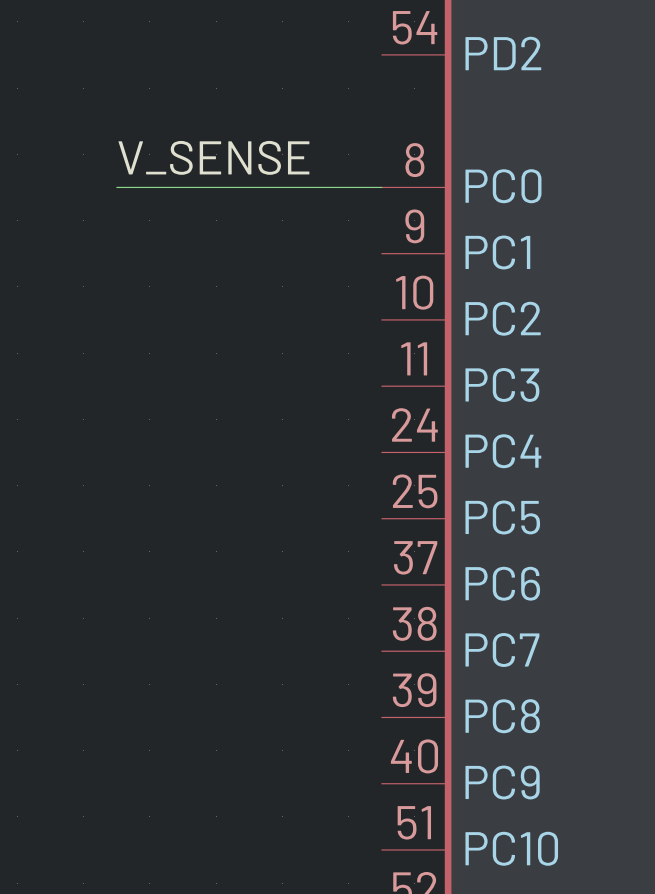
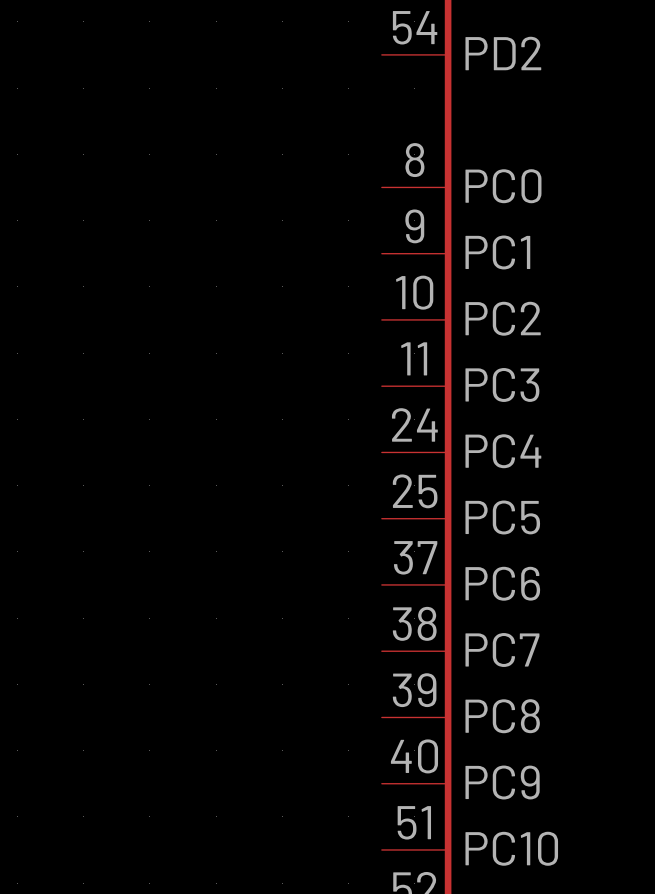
label: V_SENSE (213, 157) -> none
wire: (116, 187) (381, 187) -> none

